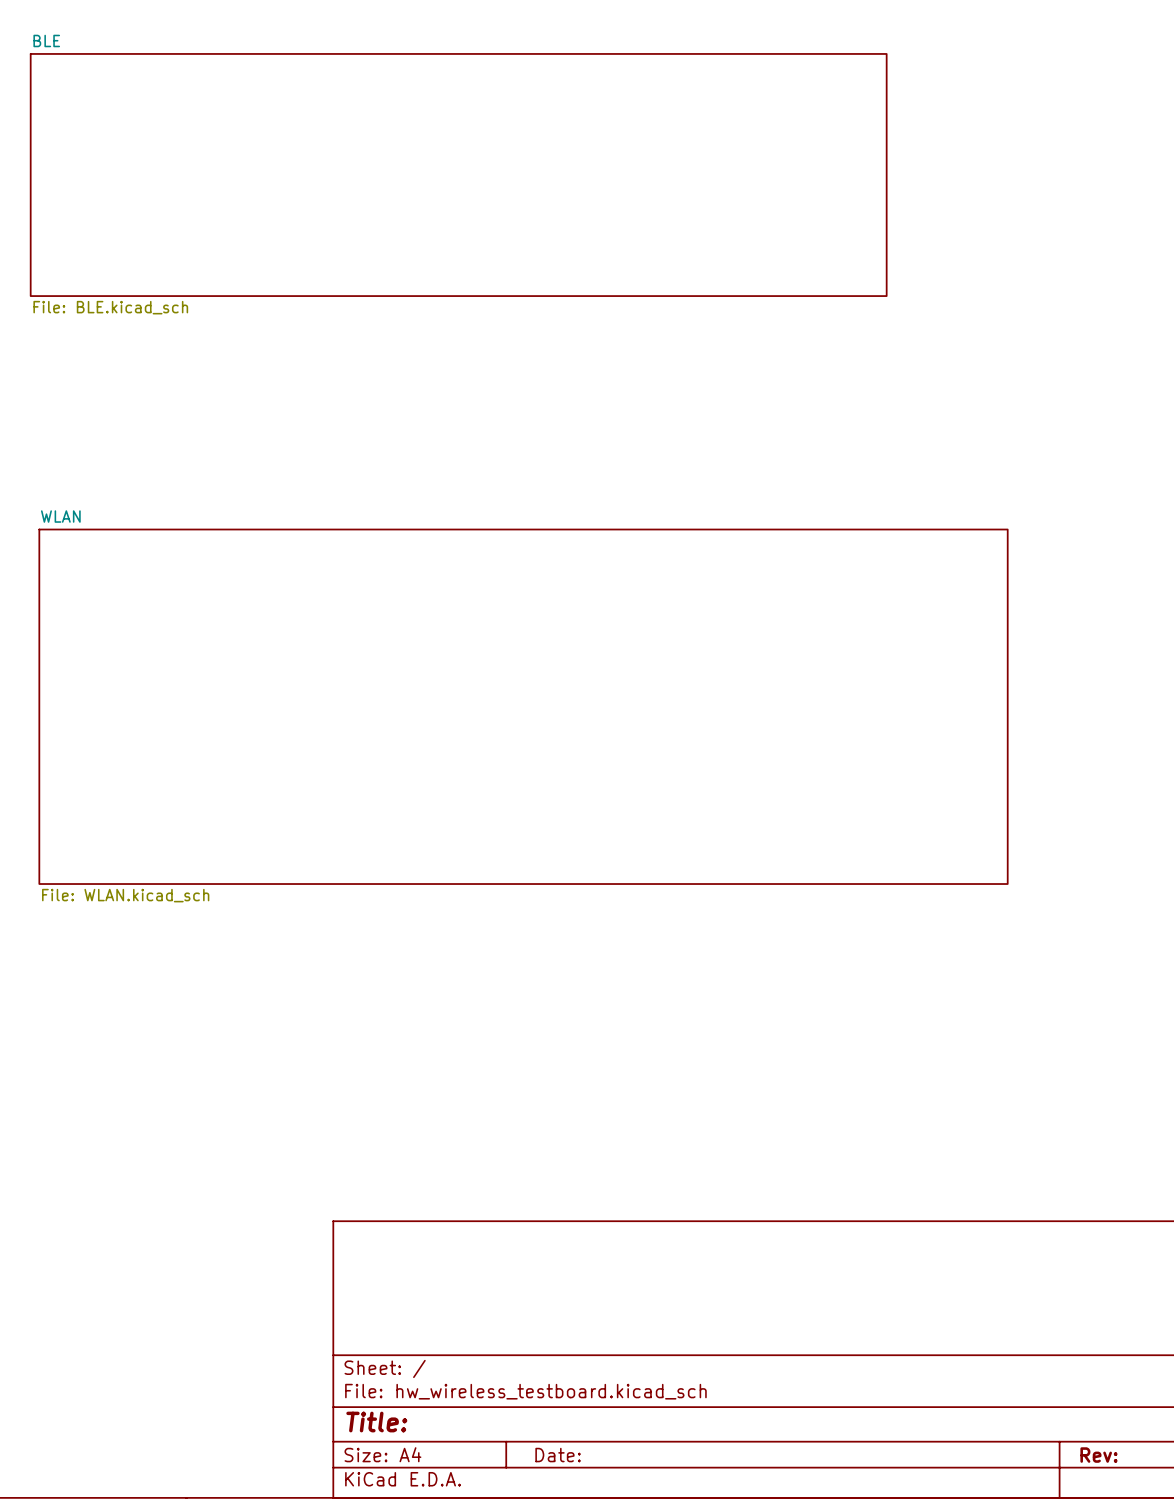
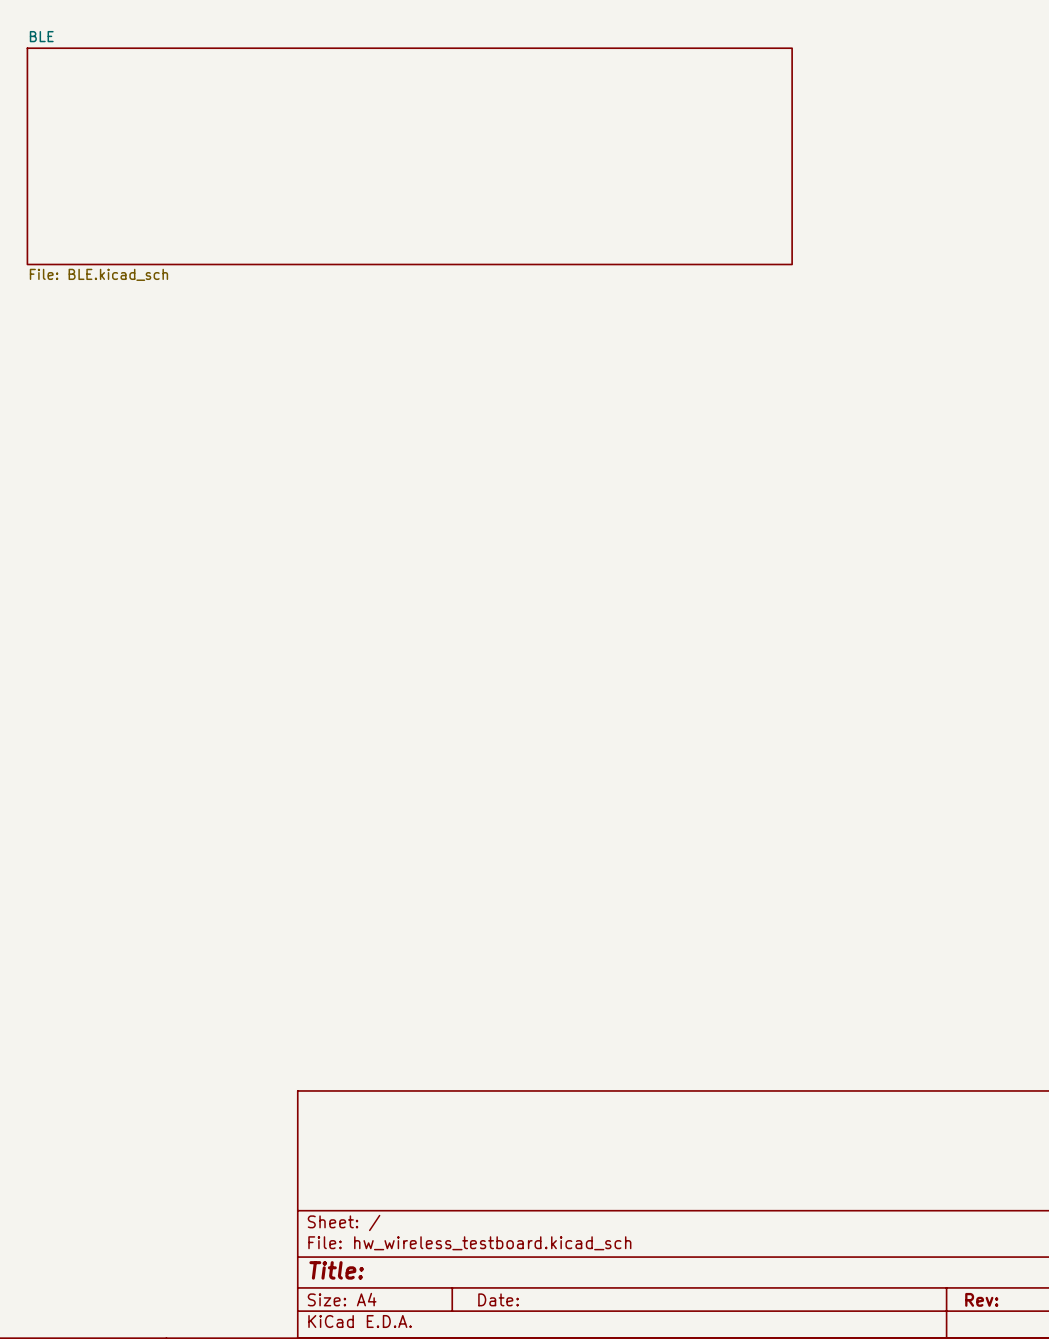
sheet WLAN: File: WLAN.kicad_sch (523, 706) -> none

